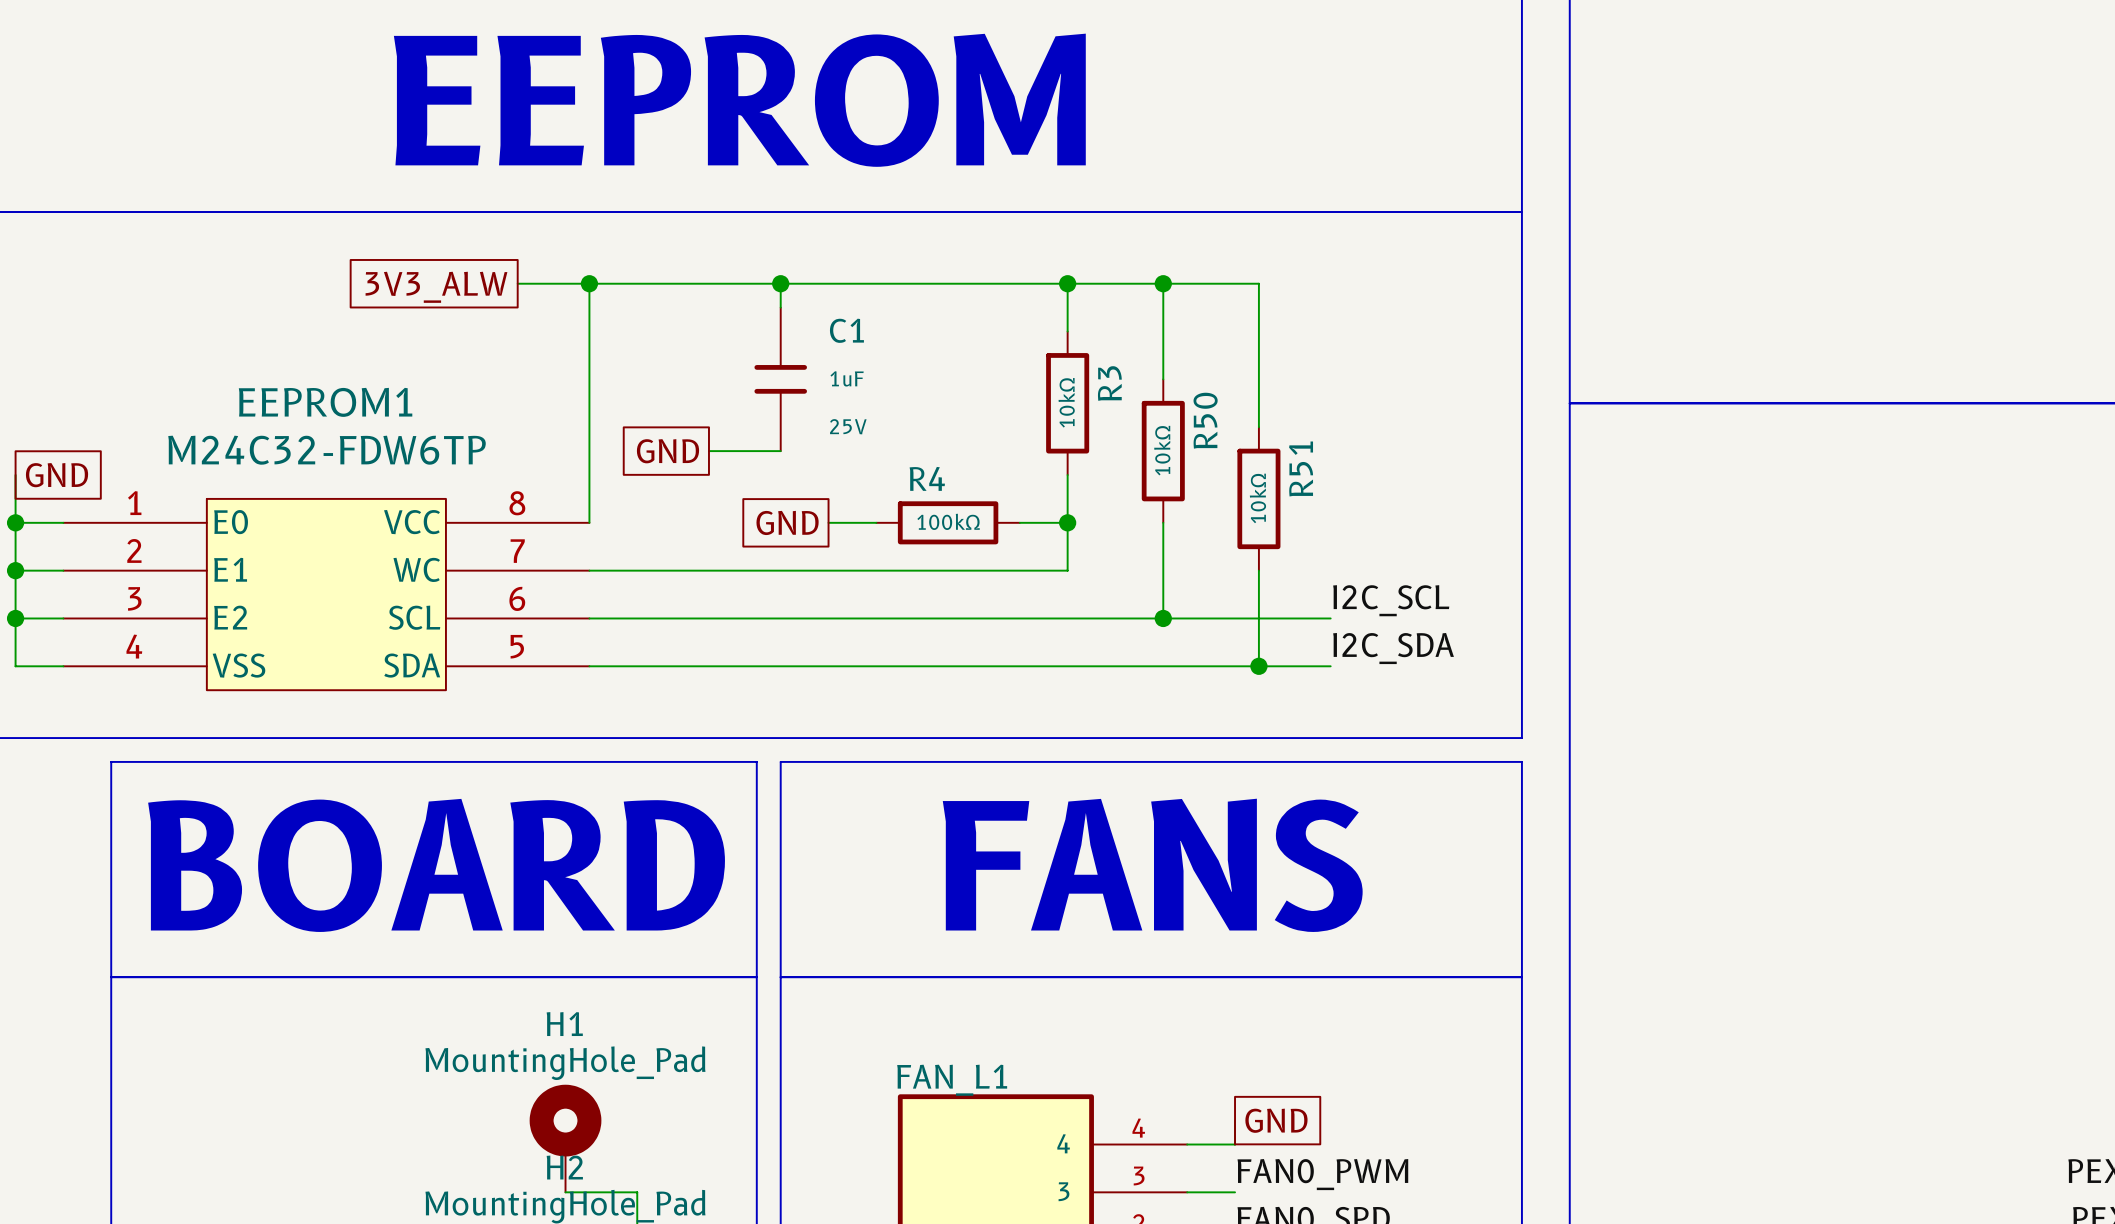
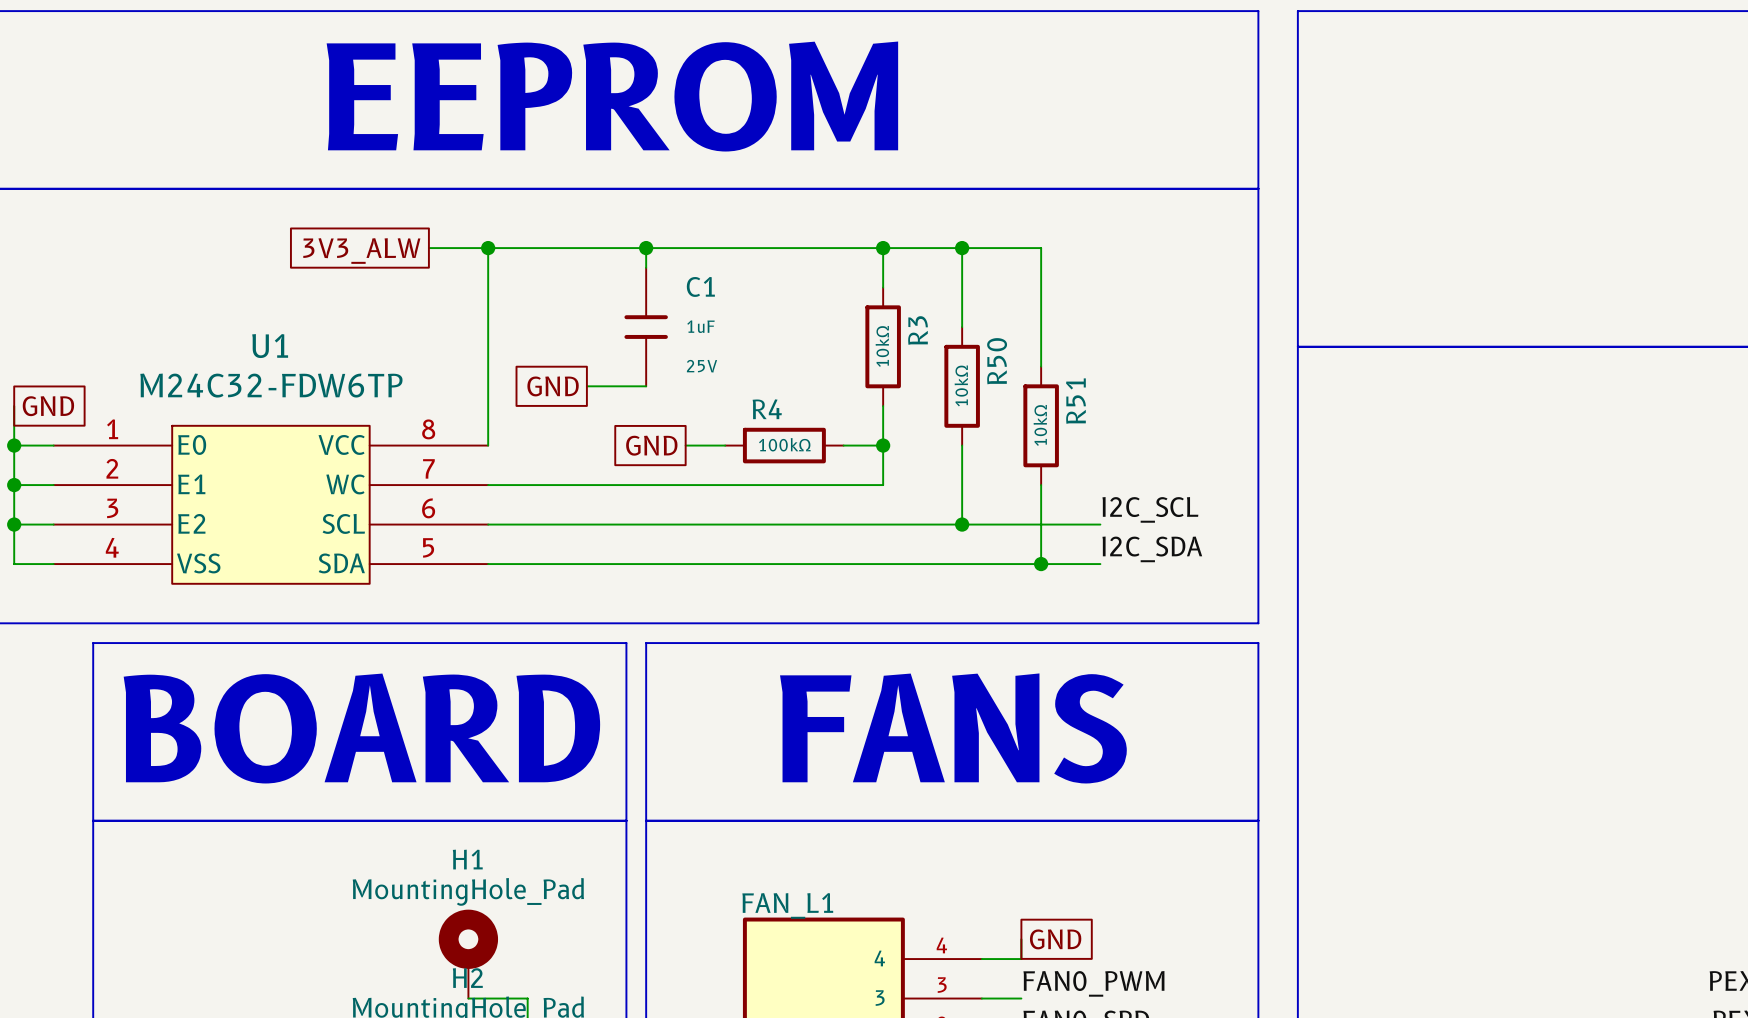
EEPROM1 name: EEPROM1 (325, 402) -> U1 (270, 346)

